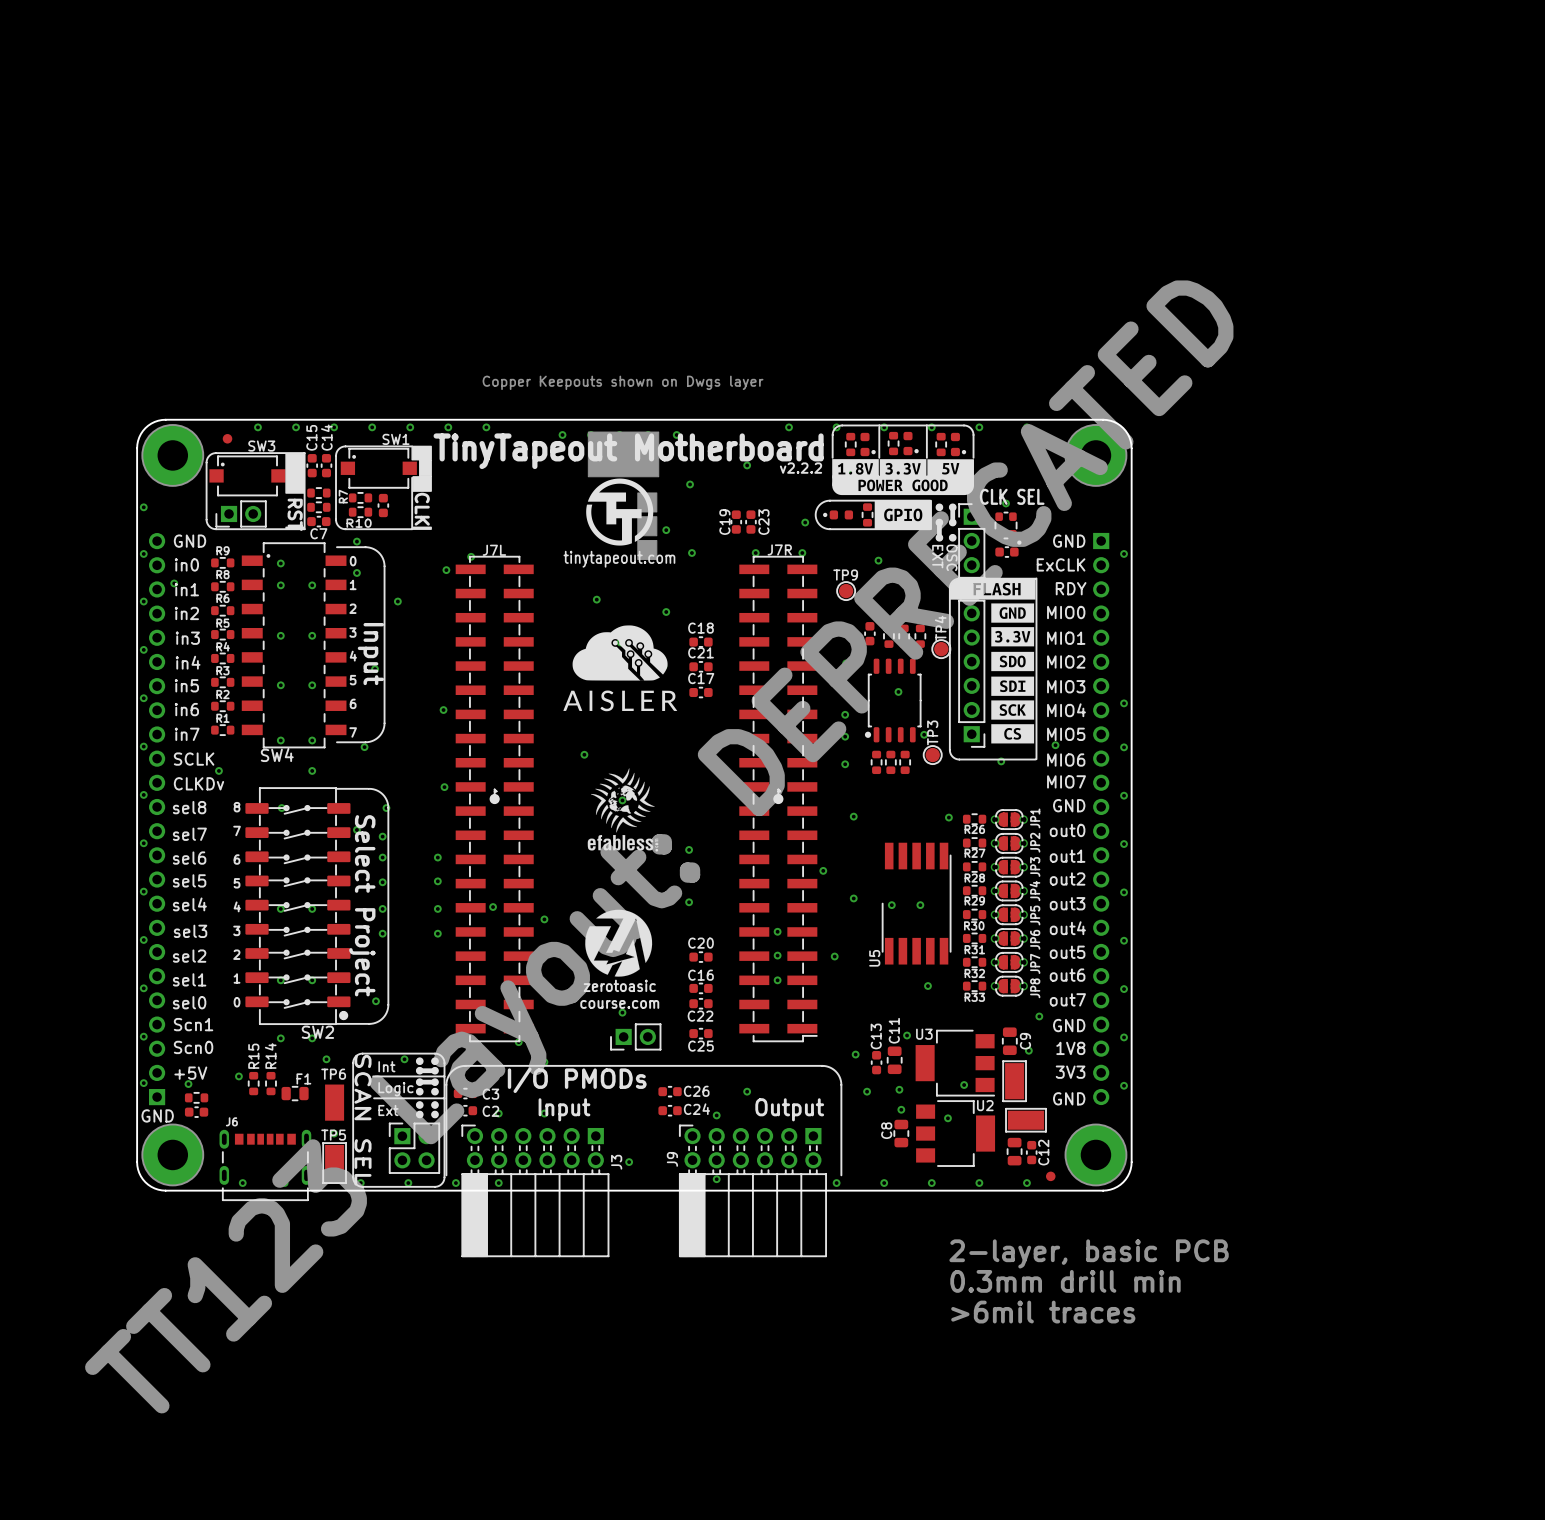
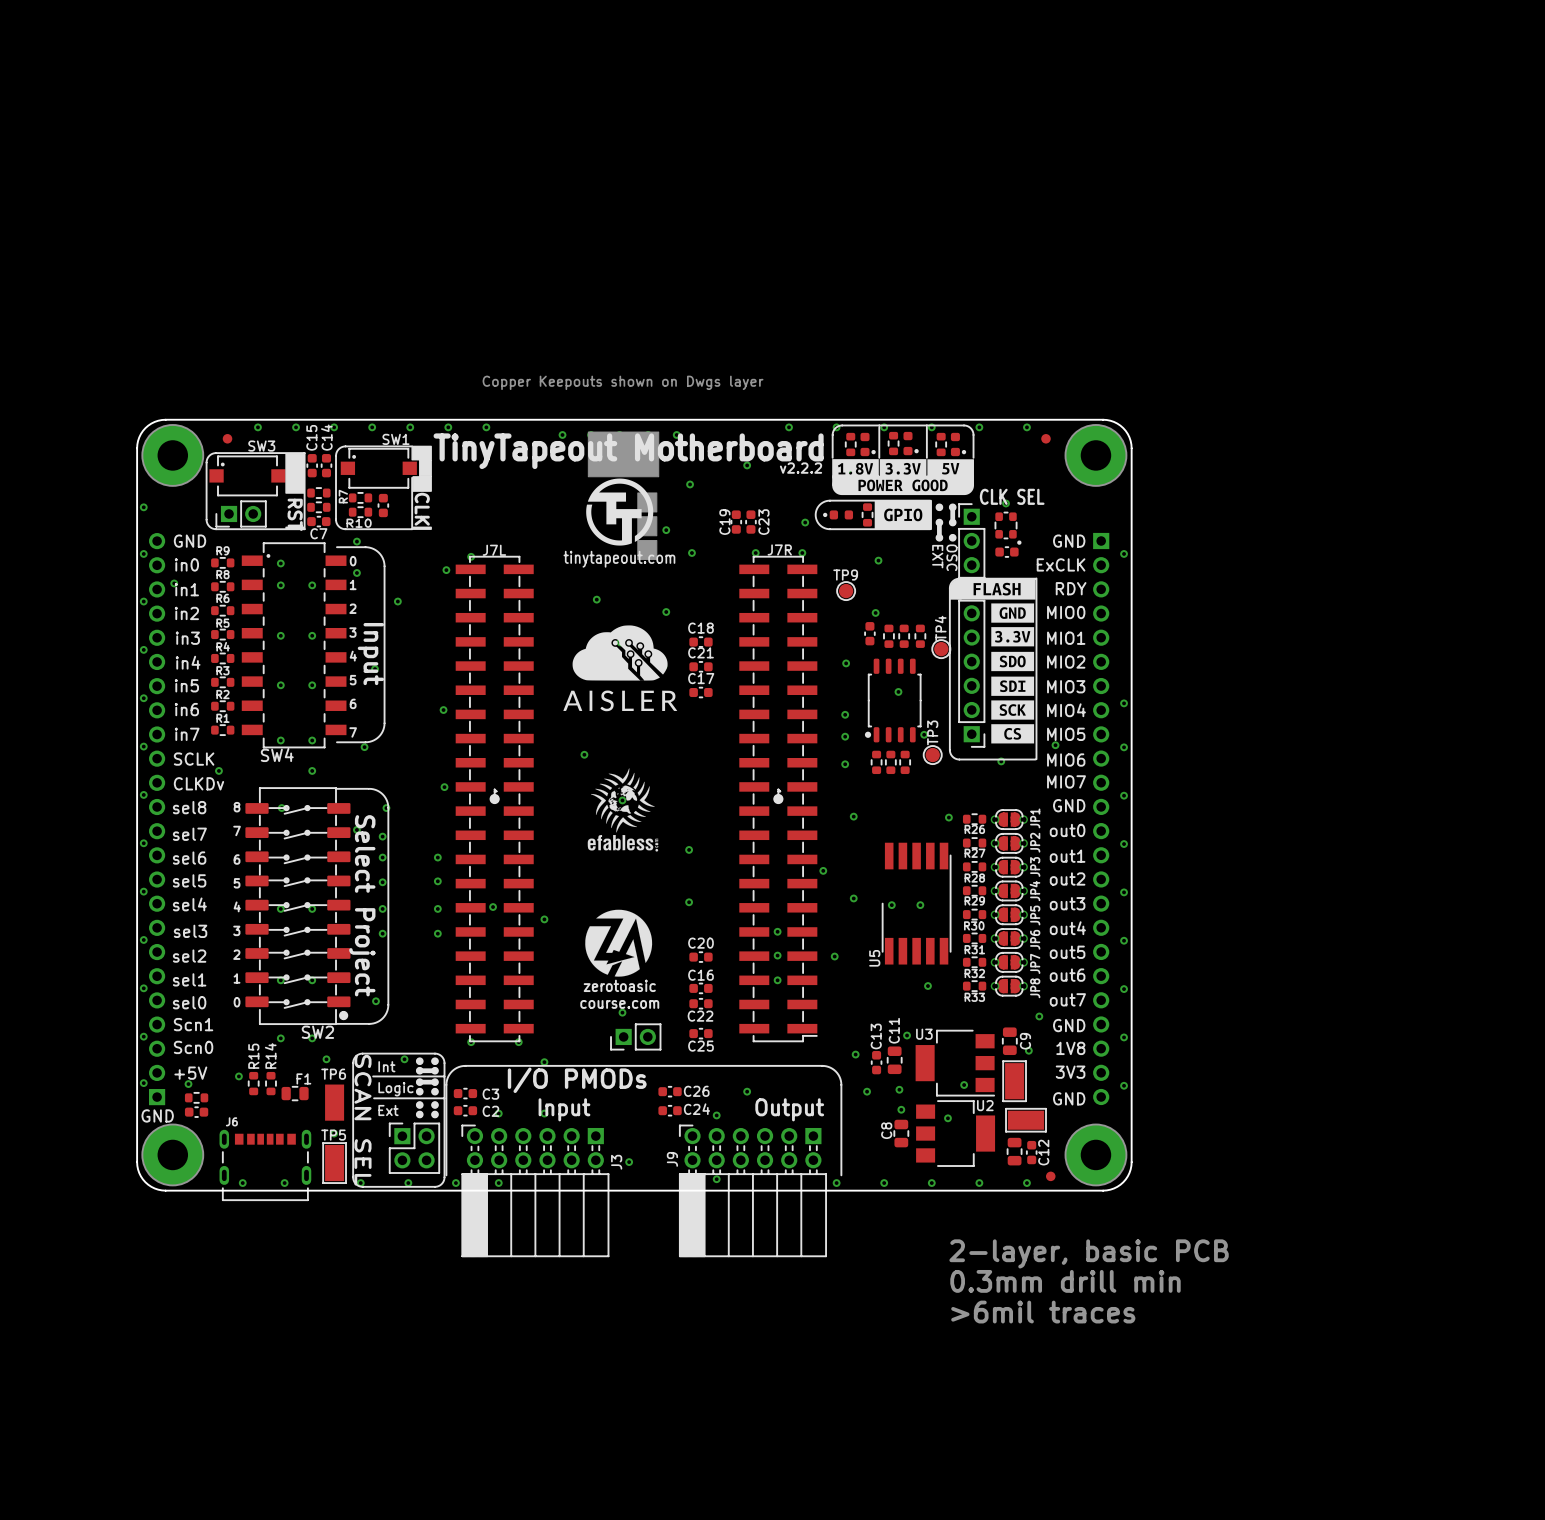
text: TT123 Layout: DEPRECATED (659, 846) -> none

